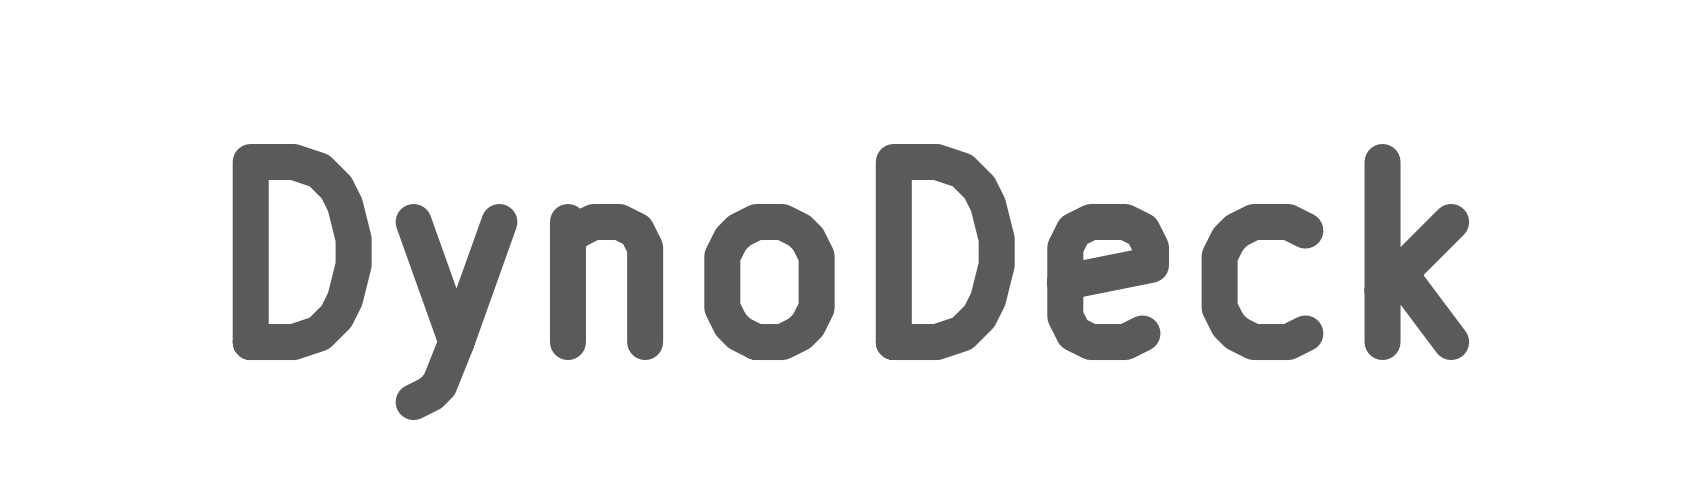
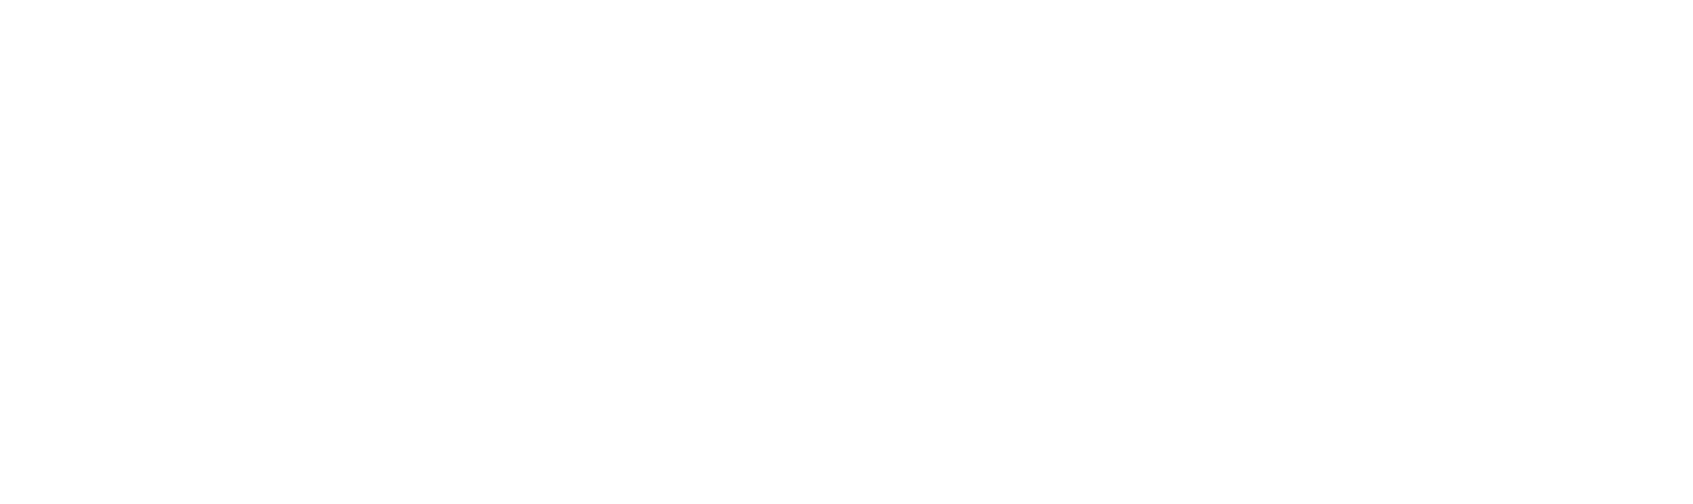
text: DynoDeck (850, 282) -> none

